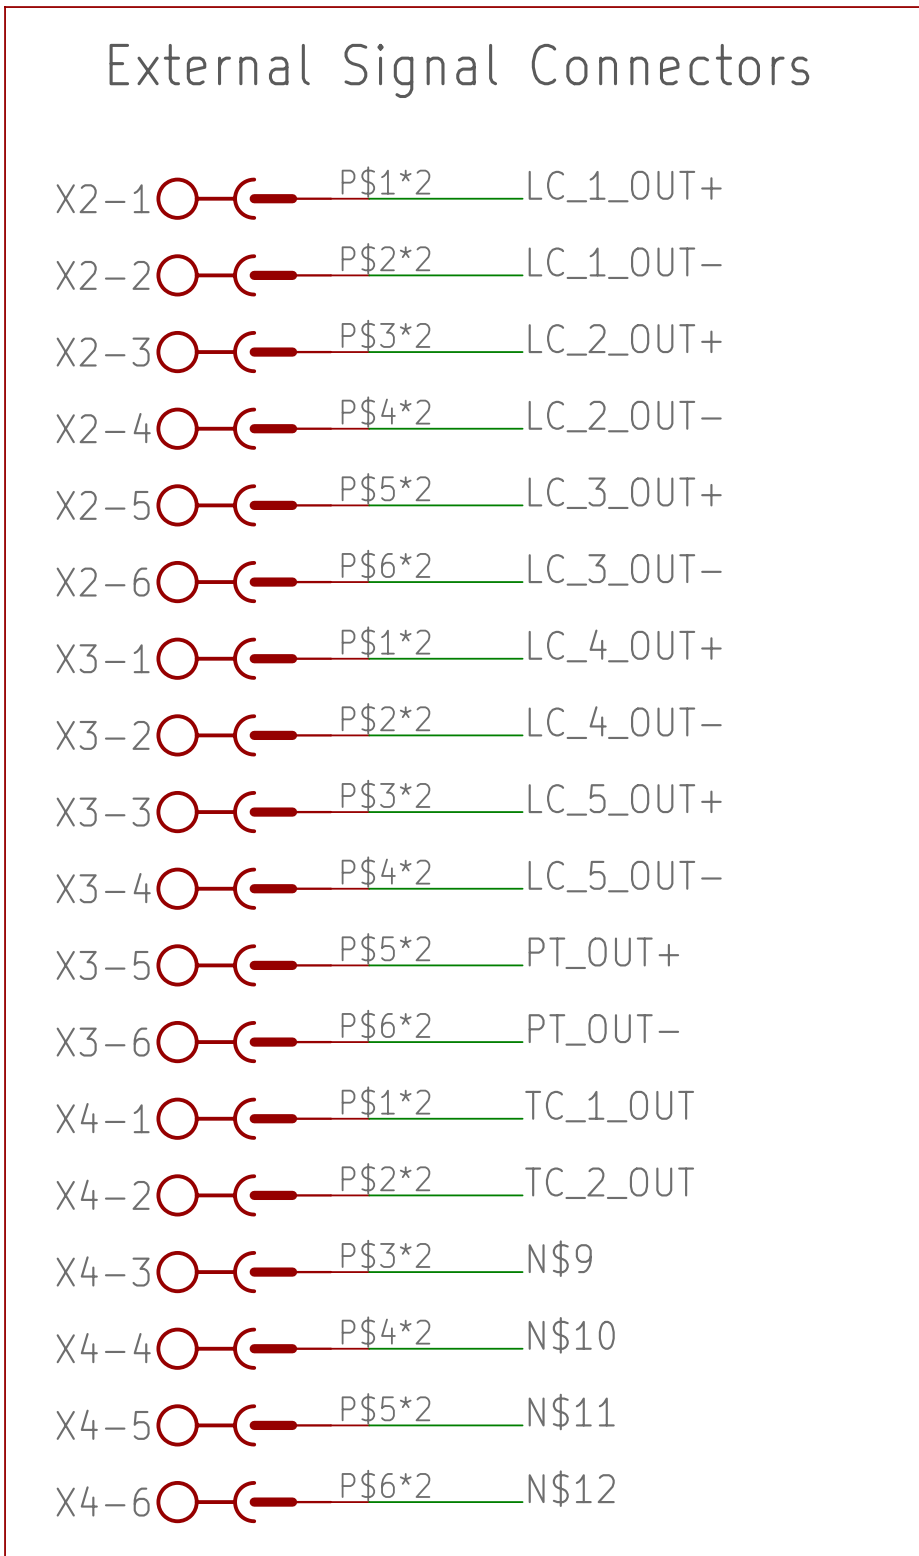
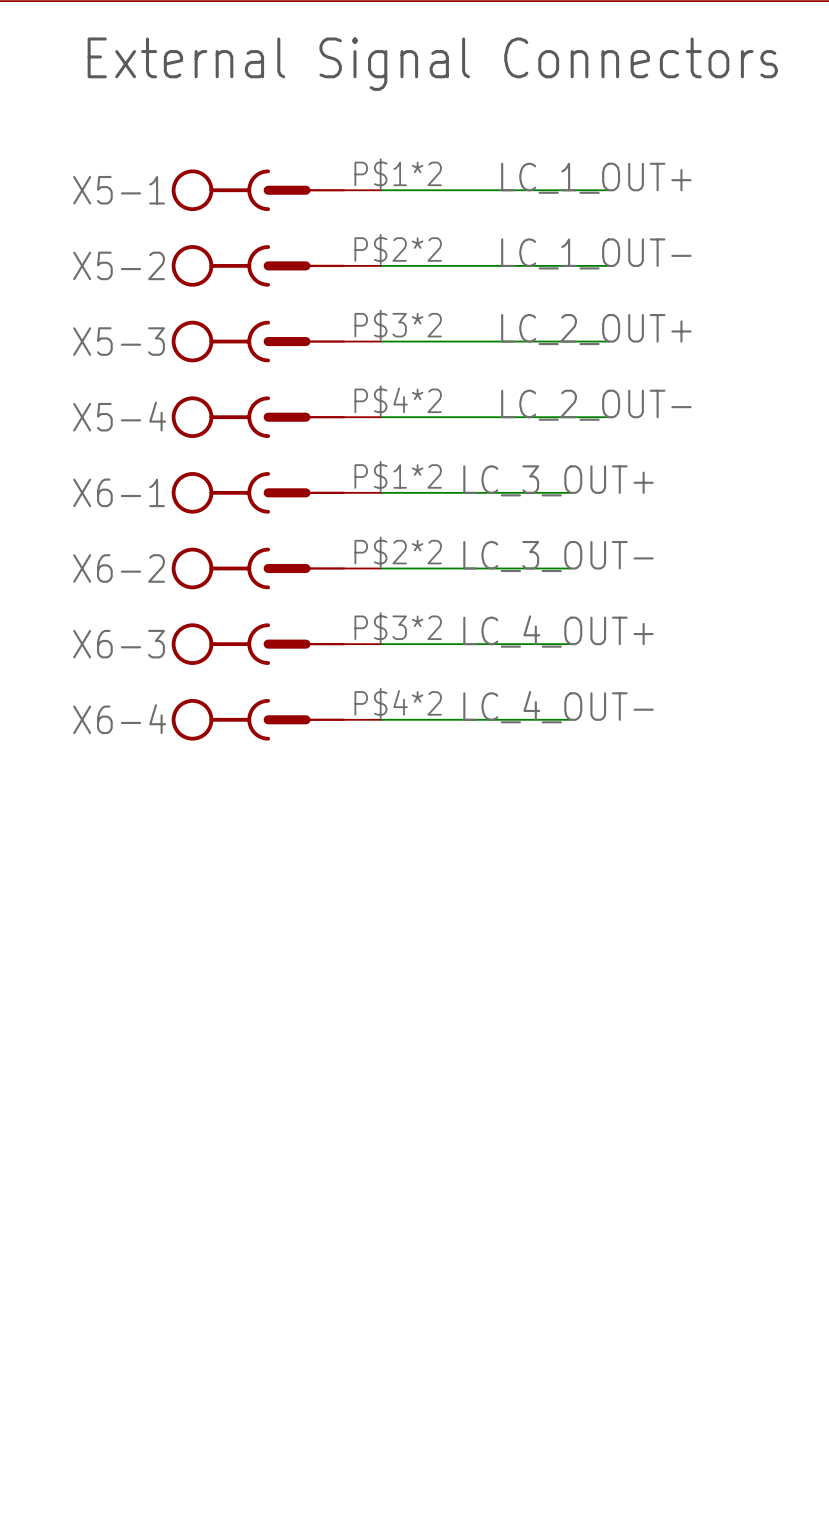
X2-1: (262, 198) -> none
X5-1: none -> (276, 190)
wire: none -> (495, 190) (608, 190)
X2-2: (262, 275) -> none
X5-2: none -> (276, 265)
wire: none -> (495, 265) (608, 265)
X2-3: (262, 352) -> none
X5-3: none -> (276, 341)
wire: none -> (495, 341) (608, 341)
X2-4: (262, 428) -> none
X5-4: none -> (276, 417)
wire: none -> (495, 417) (608, 417)
label position: LC_3_OUT+ (625, 493) -> LC_3_OUT+ (558, 480)
X2-5: (262, 505) -> none
X6-1: none -> (276, 492)
wire: none -> (495, 492) (570, 492)
label position: LC_3_OUT- (625, 569) -> LC_3_OUT- (558, 556)
X2-6: (262, 582) -> none
X6-2: none -> (276, 568)
wire: none -> (495, 568) (570, 568)
label position: LC_4_OUT+ (625, 645) -> LC_4_OUT+ (558, 631)
X3-1: (262, 658) -> none
X6-3: none -> (276, 644)
wire: none -> (495, 644) (570, 644)
label position: LC_4_OUT- (625, 722) -> LC_4_OUT- (558, 707)
X3-2: (262, 735) -> none
X6-4: none -> (276, 719)
wire: none -> (495, 719) (570, 719)
label: LC_5_OUT+ (625, 799) -> none
X3-3: (262, 812) -> none
wire: (369, 812) (522, 812) -> none
label: LC_5_OUT- (625, 876) -> none
X3-4: (262, 888) -> none
wire: (369, 888) (522, 888) -> none
label: PT_OUT+ (603, 953) -> none
X3-5: (262, 965) -> none
wire: (369, 965) (522, 965) -> none
label: PT_OUT- (603, 1029) -> none
X3-6: (262, 1042) -> none
wire: (369, 1042) (522, 1042) -> none
label: TC_1_OUT (609, 1106) -> none
X4-1: (262, 1118) -> none
wire: (369, 1118) (522, 1118) -> none
label: TC_2_OUT (609, 1183) -> none
X4-2: (262, 1195) -> none
wire: (369, 1195) (522, 1195) -> none
label: N$9 (560, 1258) -> none
X4-3: (262, 1272) -> none
wire: (369, 1272) (522, 1272) -> none
label: N$10 (571, 1335) -> none
X4-4: (262, 1348) -> none
wire: (369, 1348) (522, 1348) -> none
label: N$11 (571, 1411) -> none
X4-5: (262, 1425) -> none
wire: (369, 1425) (522, 1425) -> none
label: N$12 (571, 1488) -> none
X4-6: (262, 1502) -> none
wire: (369, 1502) (522, 1502) -> none

